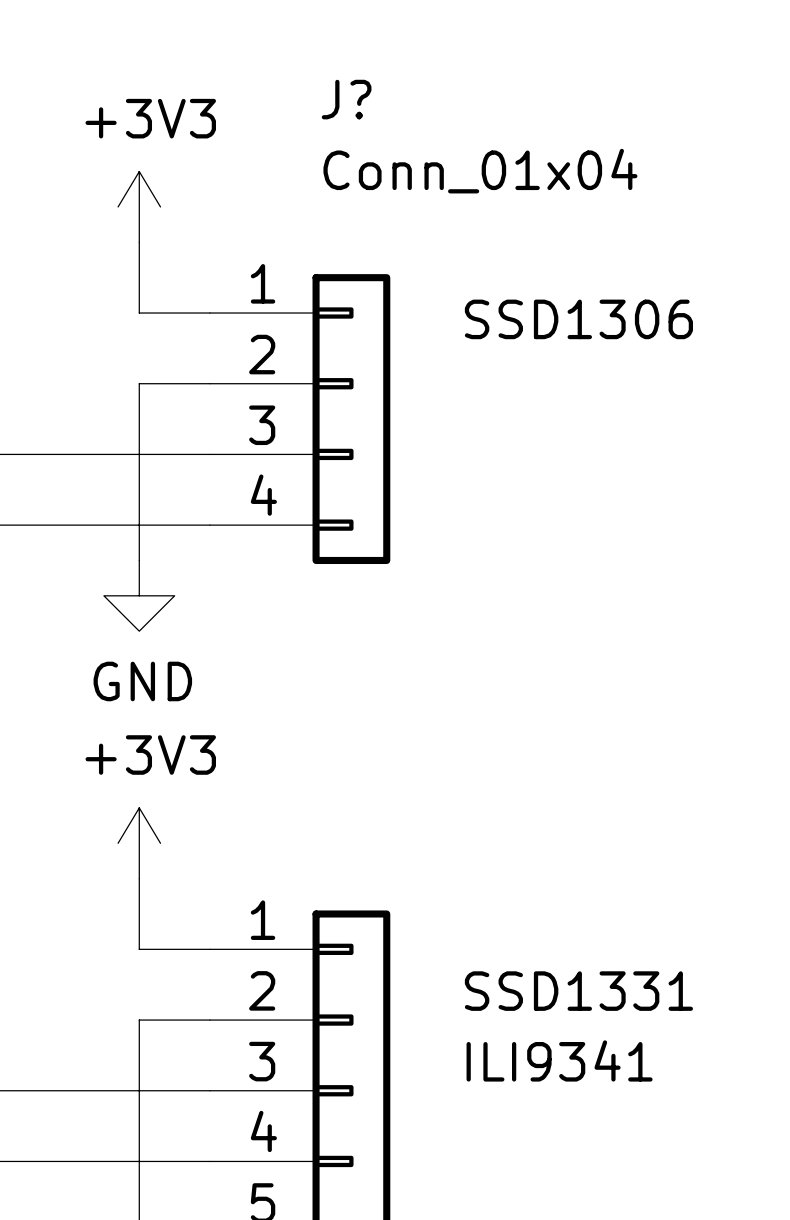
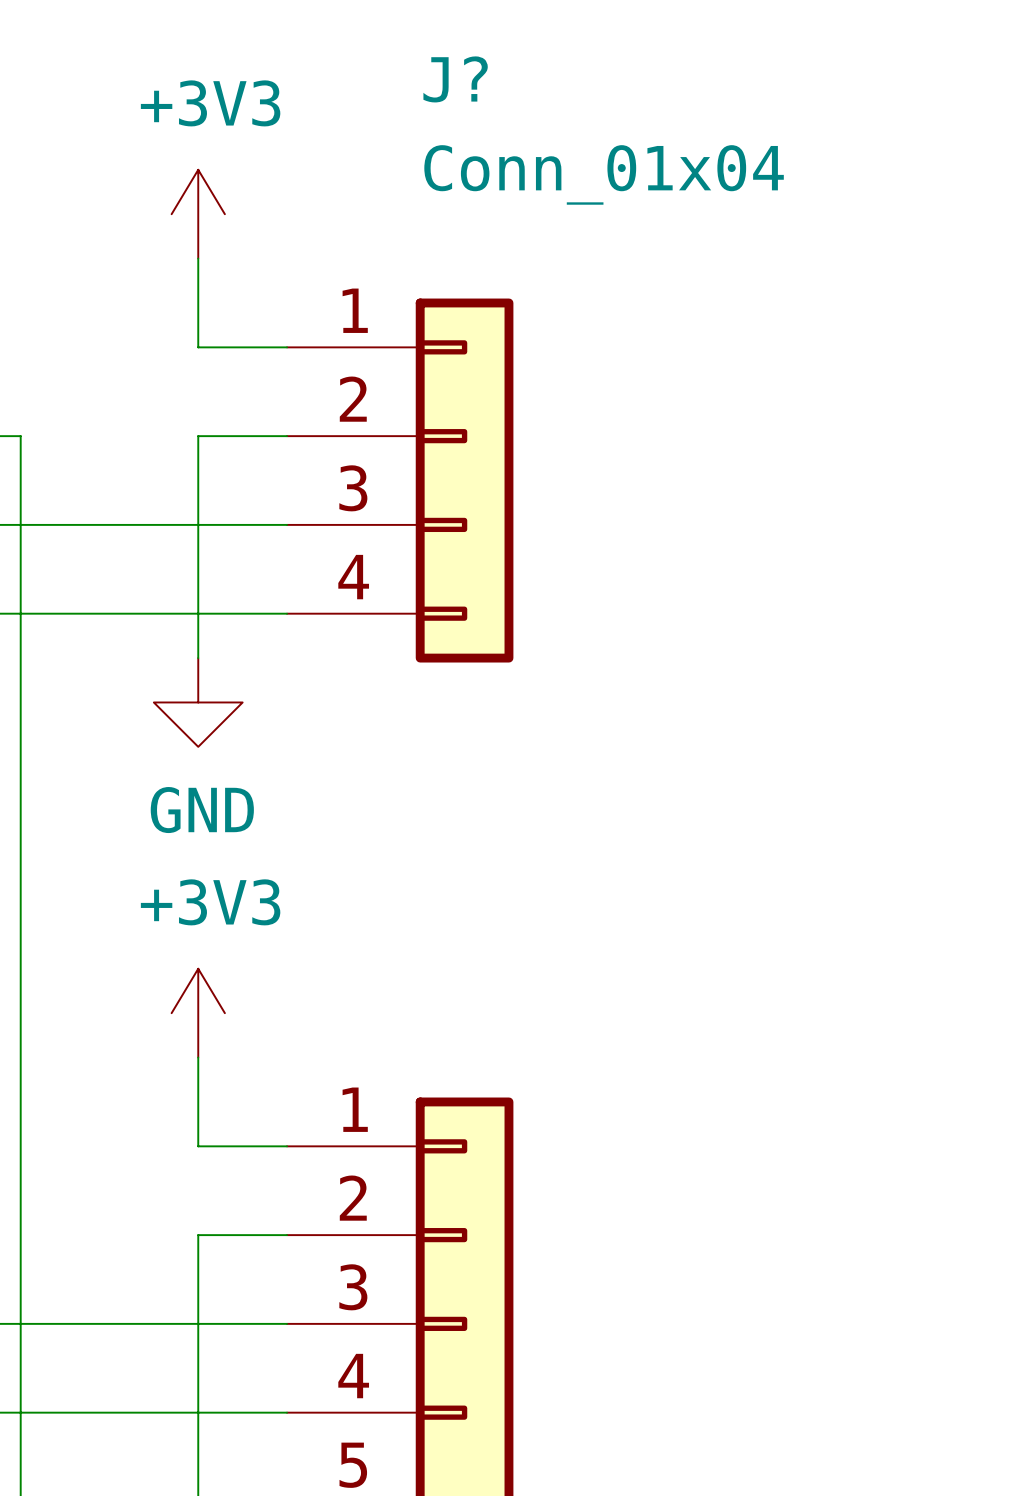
text: SSD1306 (578, 319) -> none
text: SSD1331 (578, 991) -> none
text: ILI9341 (559, 1060) -> none

